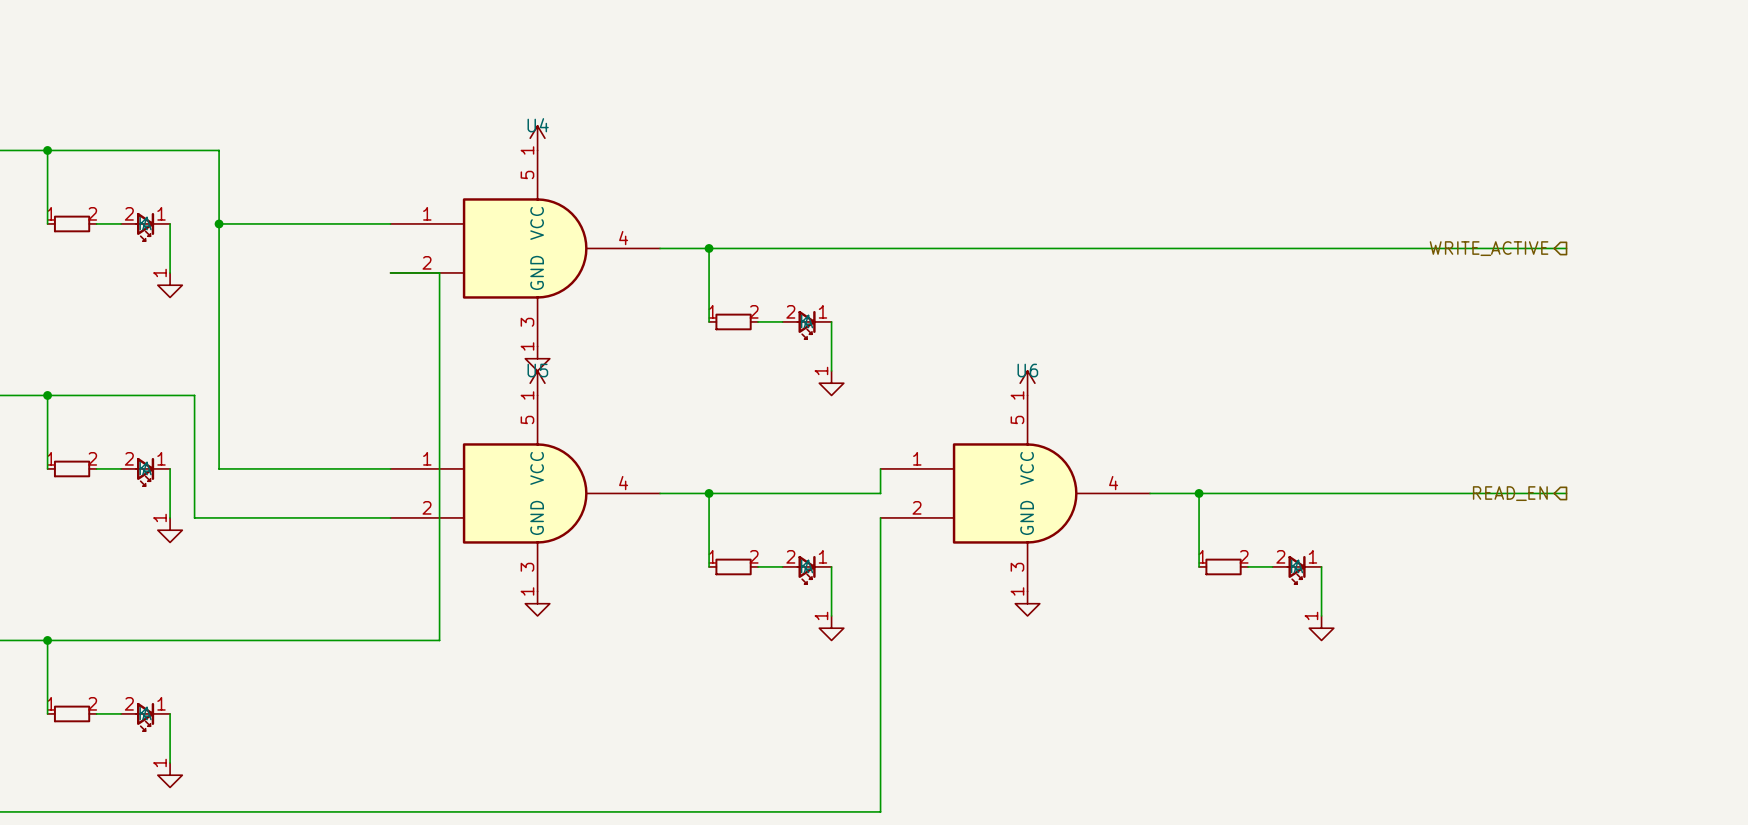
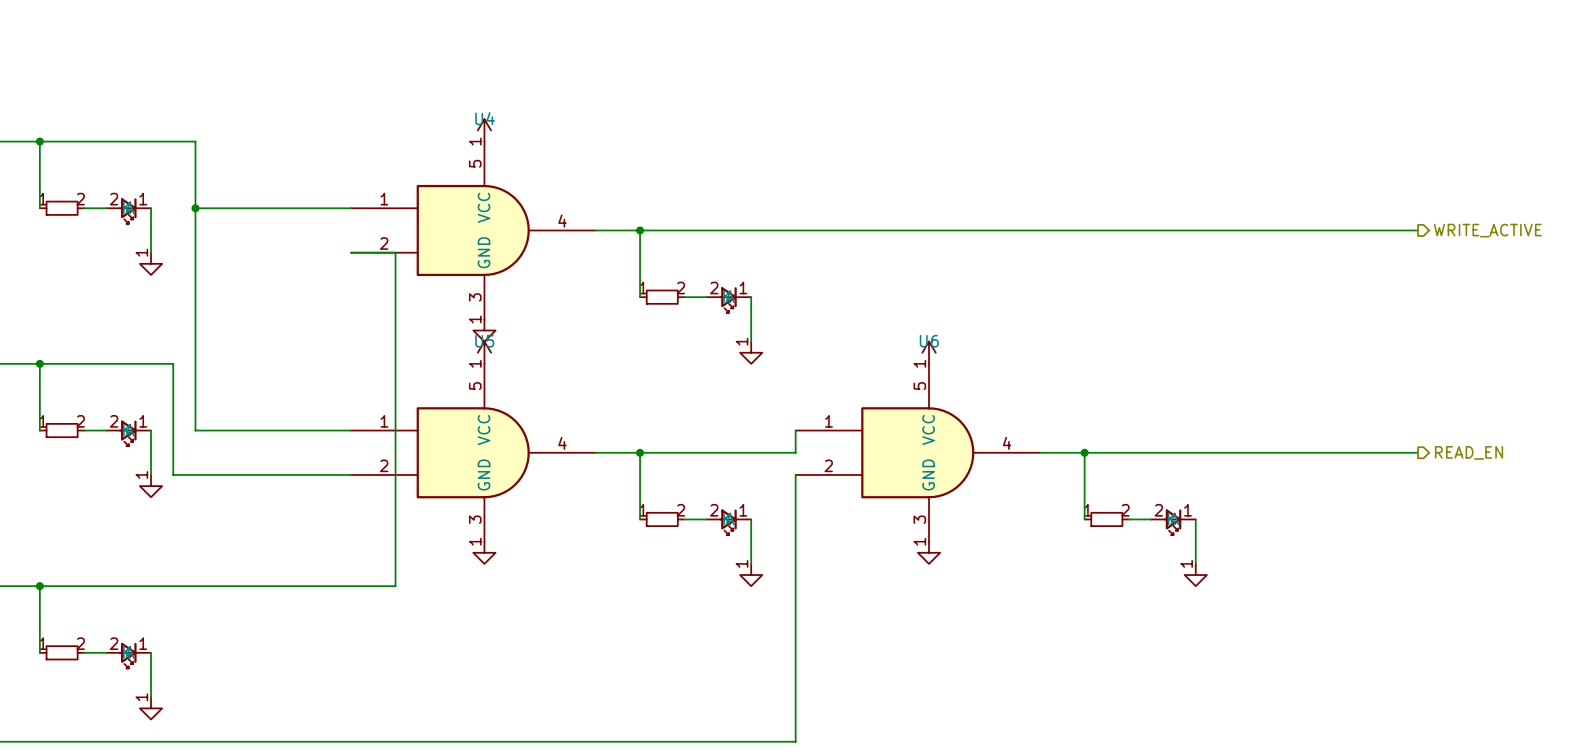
hierarchical label rotation: 0° (1489, 248) -> 180° (1487, 230)
hierarchical label position: WRITE_ACTIVE (1489, 248) -> WRITE_ACTIVE (1487, 230)
hierarchical label rotation: 0° (1510, 493) -> 180° (1469, 452)
hierarchical label position: READ_EN (1510, 493) -> READ_EN (1469, 452)

